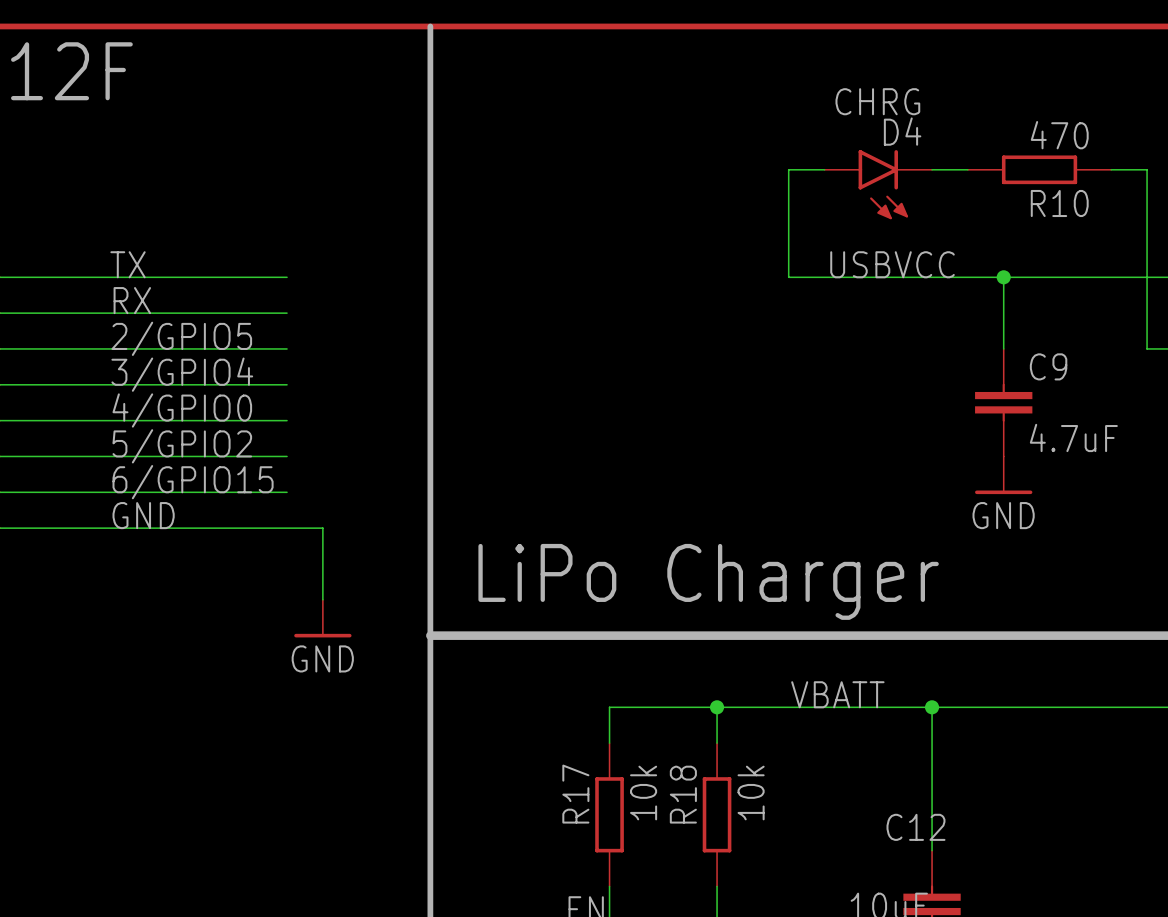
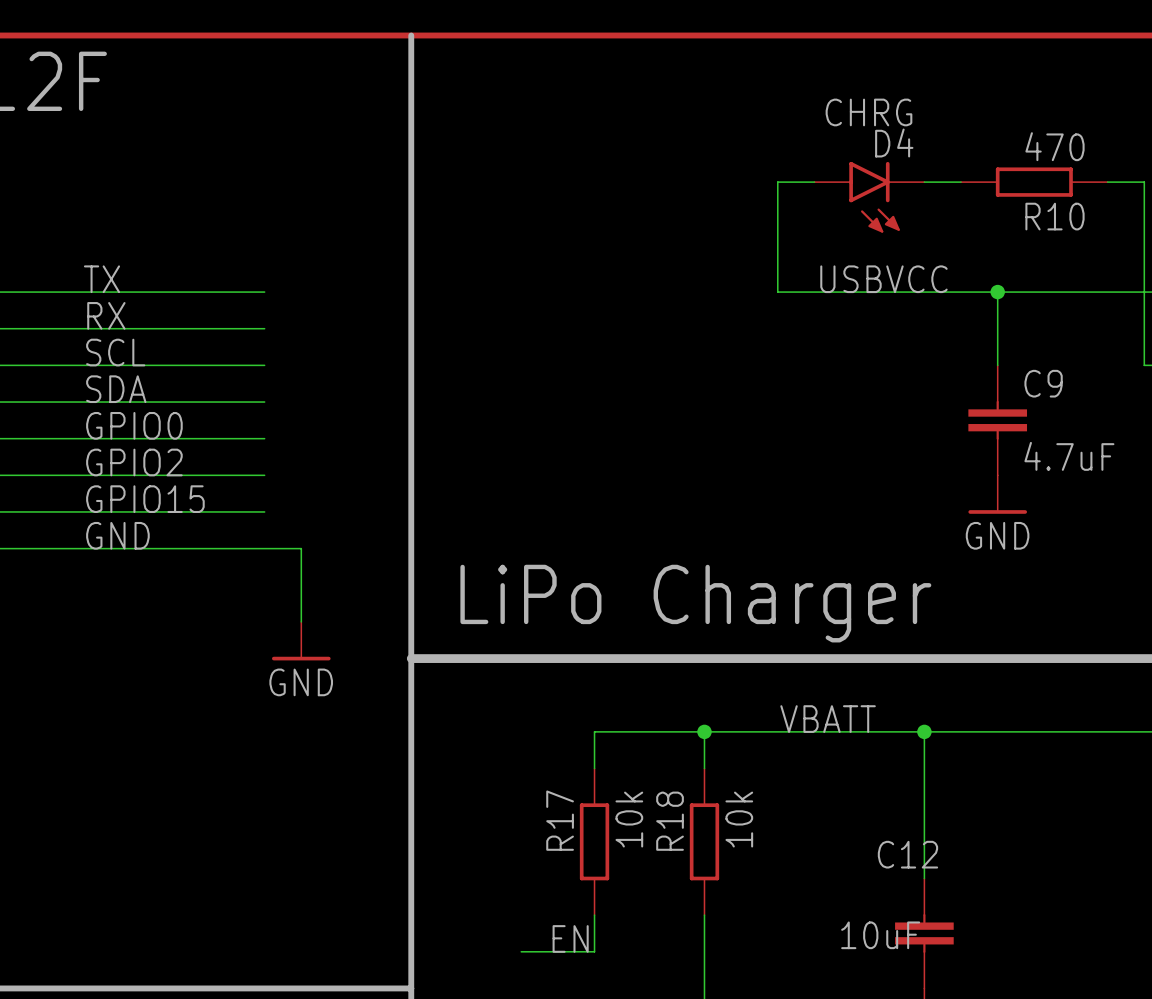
label: 2/GPIO5 (181, 338) -> SCL (115, 352)
label: 3/GPIO4 (182, 374) -> SDA (116, 389)
label: 4/GPIO0 (182, 410) -> GPIO0 (134, 425)
label: 5/GPIO2 (182, 446) -> GPIO2 (134, 462)
label: 6/GPIO15 (193, 482) -> GPIO15 (145, 499)

